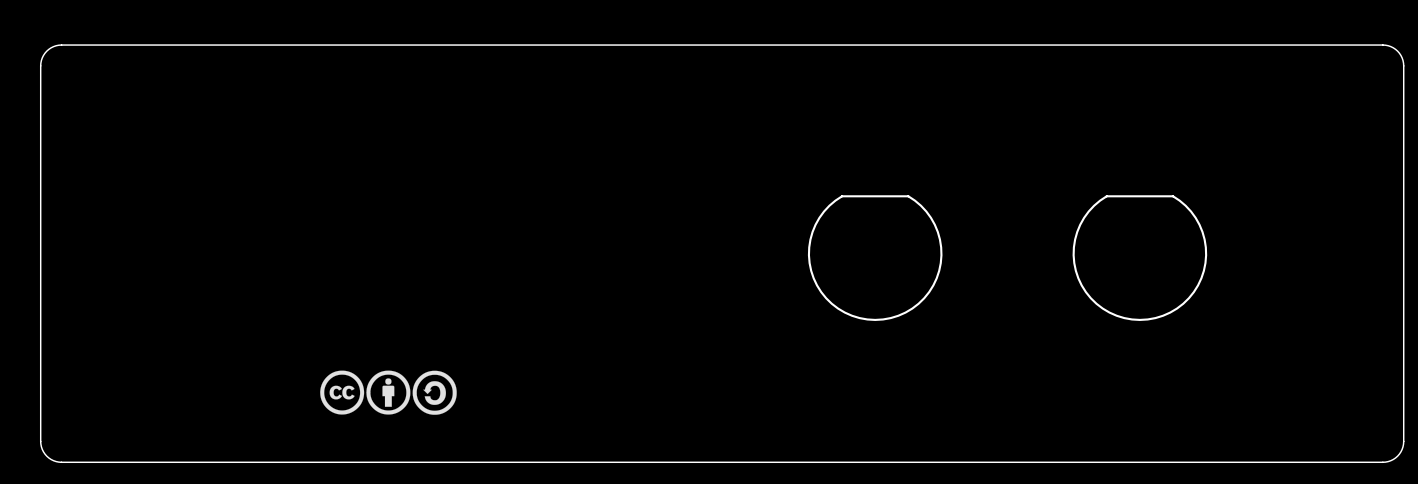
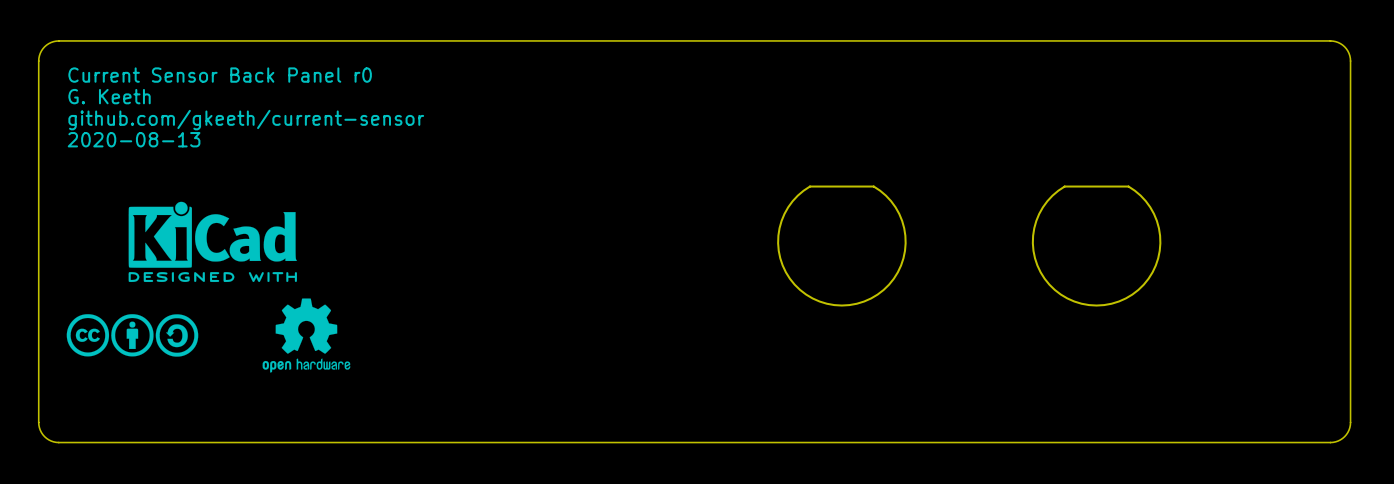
text: none -> Current Sensor Back Panel r0 (220, 75)
text: none -> G. Keeth (109, 96)
text: none -> github.com/gkeeth/current-sensor (246, 120)
text: none -> 2020-08-13 (134, 139)
drawing: none -> [128, 201, 297, 283]
drawing: none -> [262, 298, 351, 373]
drawing position: (388, 392) -> (132, 335)

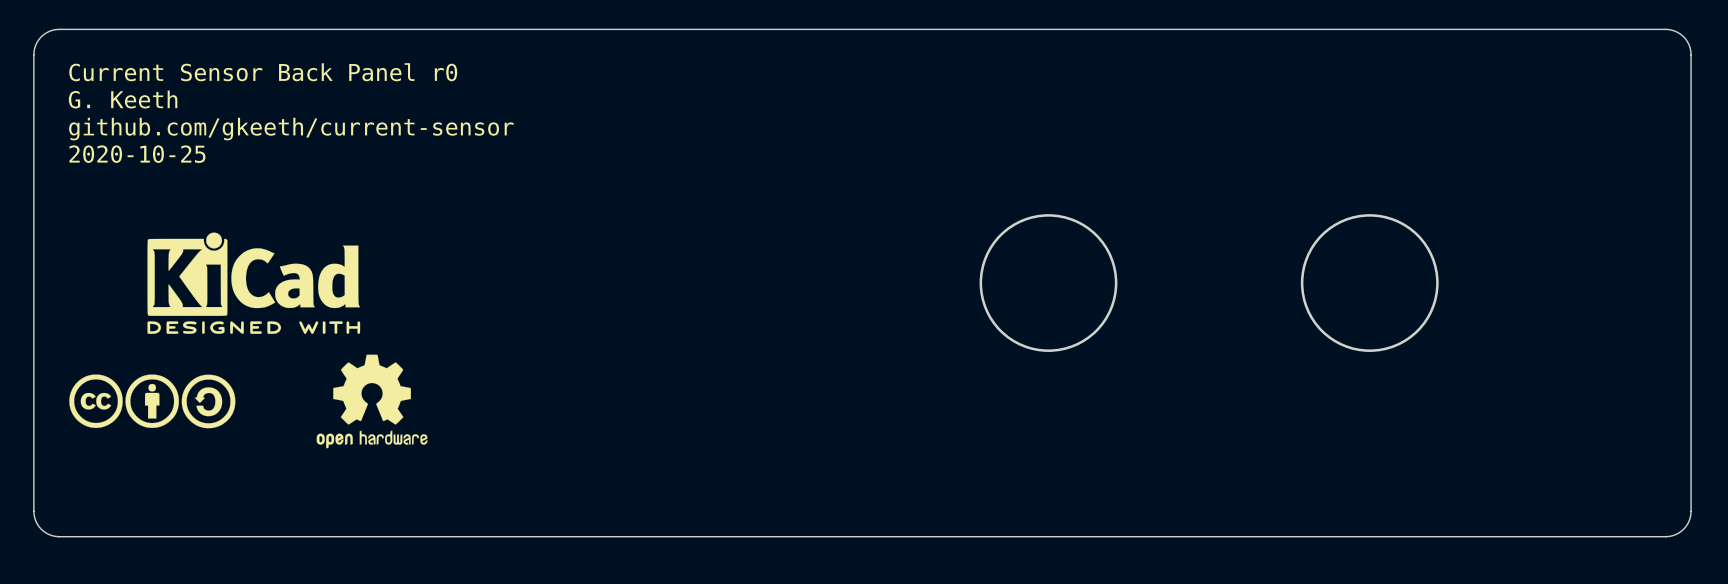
text: 2020-08-13 (134, 139) -> 2020-10-25 (137, 154)
drawing shape: [777, 185, 907, 307] -> [979, 214, 1118, 352]
drawing shape: [1031, 185, 1162, 307] -> [1300, 214, 1439, 352]

